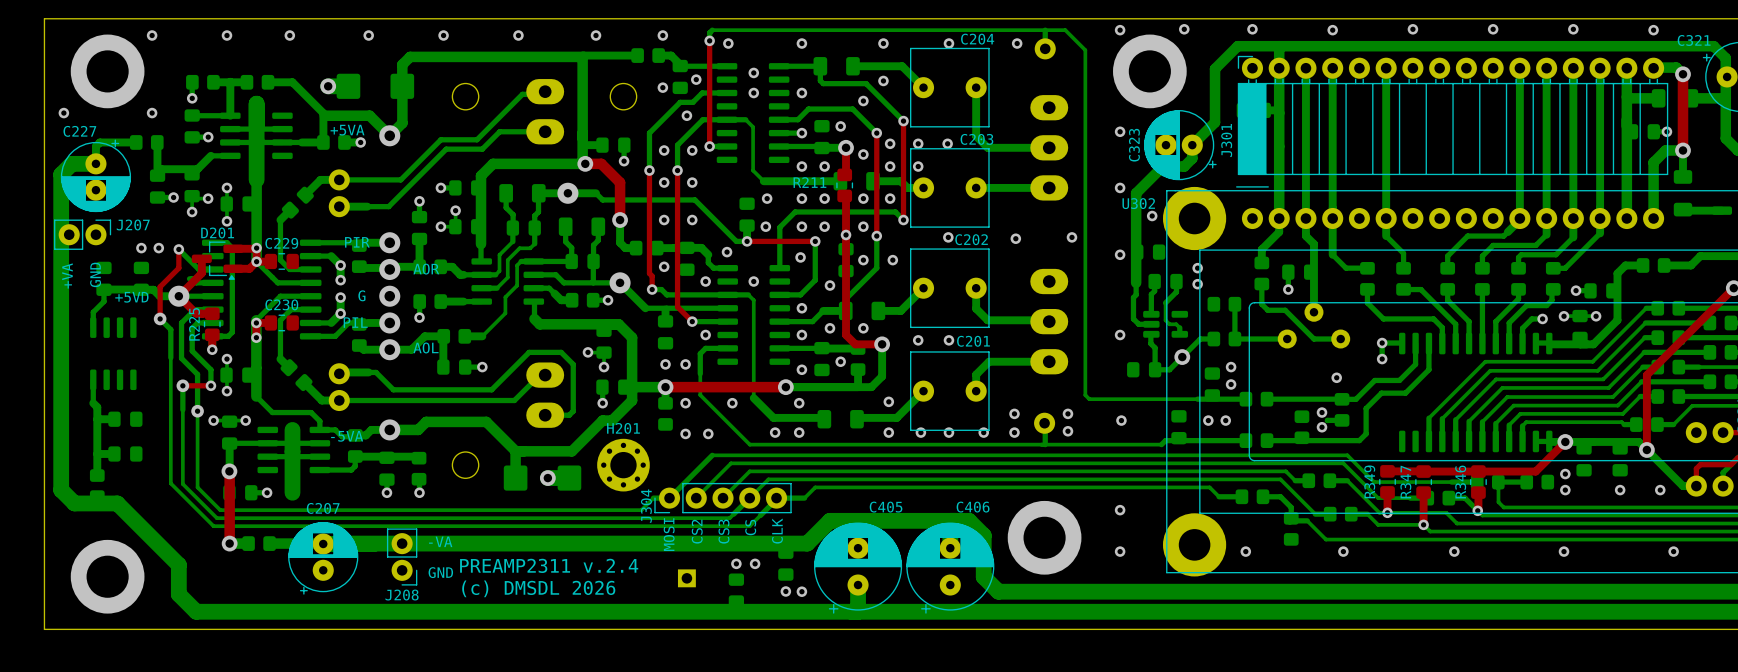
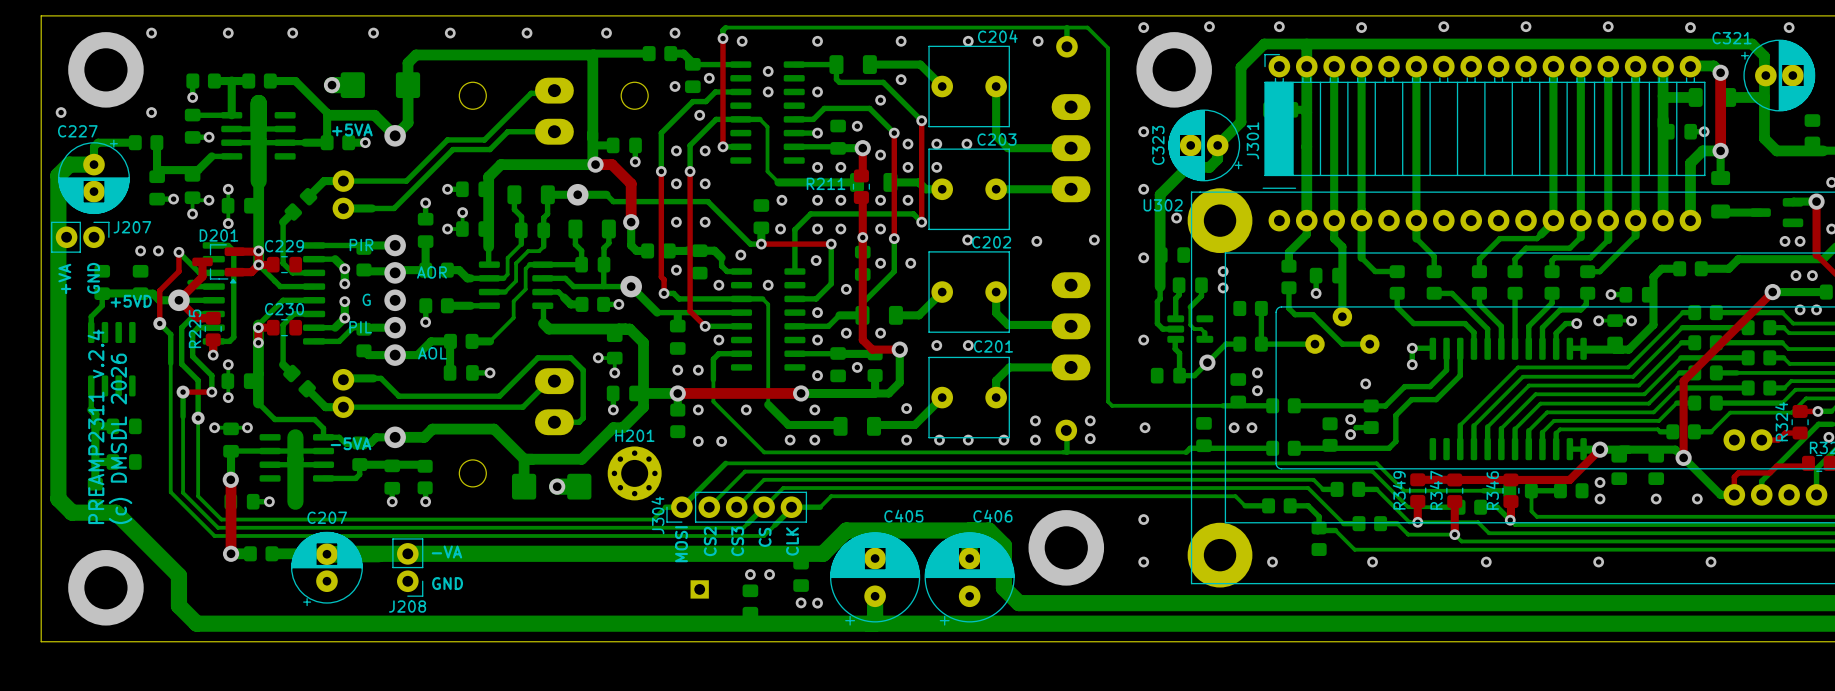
text: none -> PREAMP2311 v.2.4 (95, 426)
text: none -> (c) DMSDL 2026 (120, 438)
text: PREAMP2311 v.2.4 (549, 565) -> none
text: (c) DMSDL 2026 (538, 588) -> none

